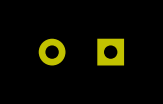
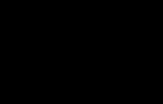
part: (81, 52) -> none

